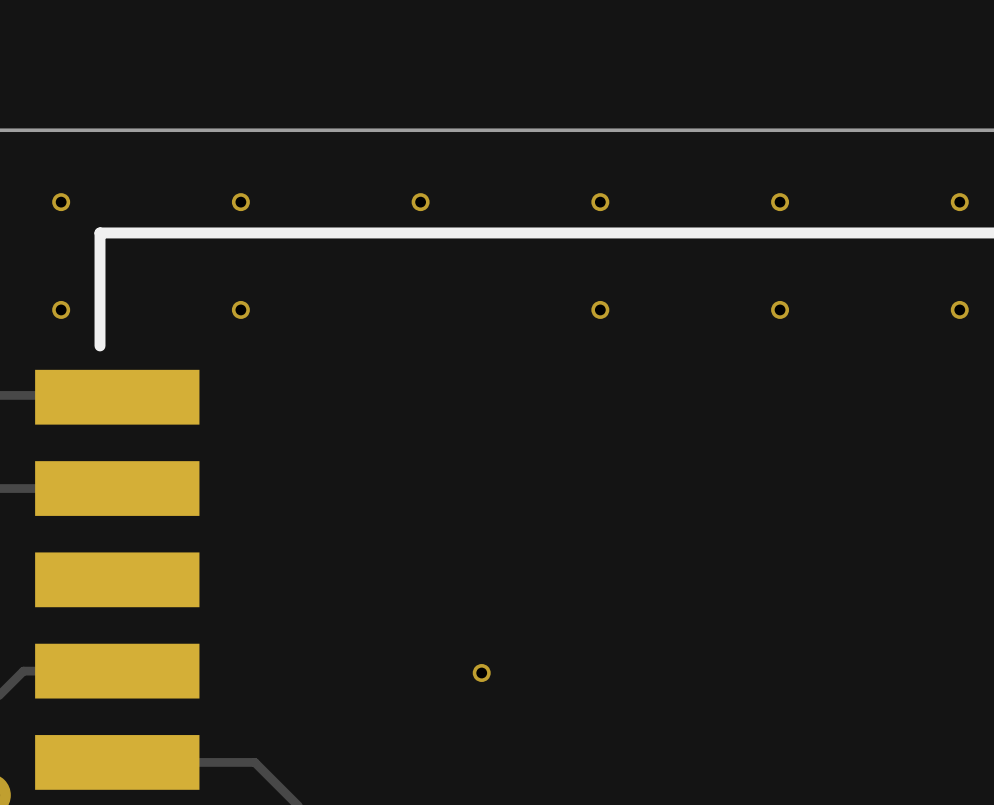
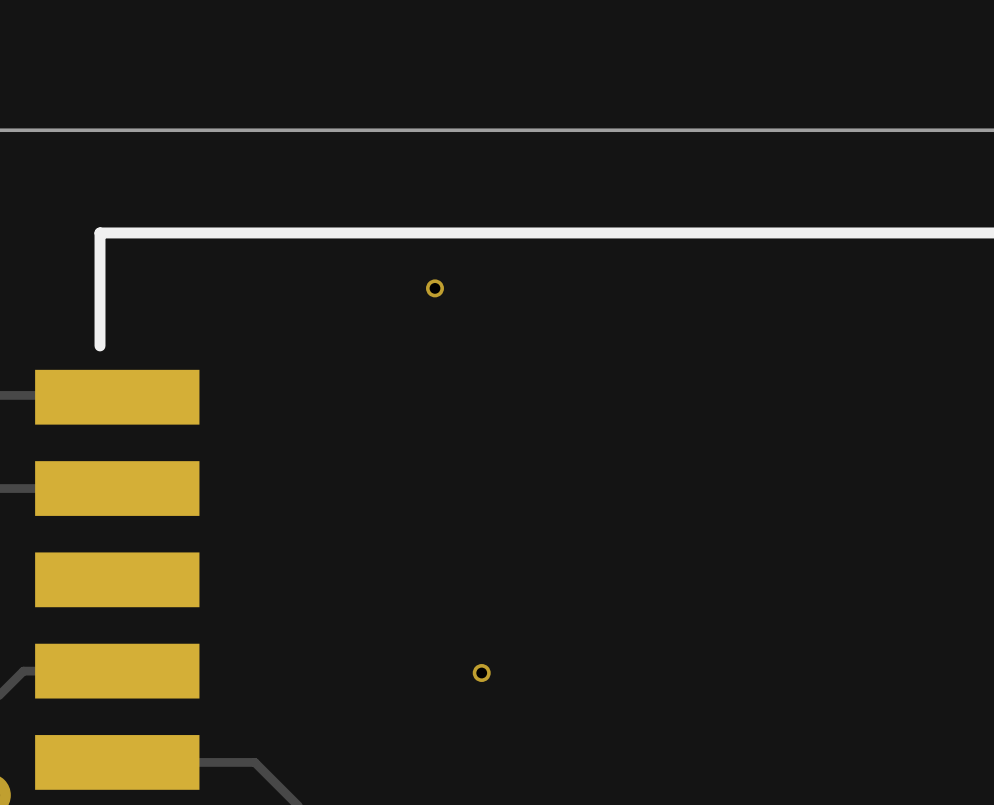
via: (61, 202) -> none
via: (240, 202) -> none
via: (420, 202) -> none
via: (600, 202) -> none
via: (780, 202) -> none
via: (959, 202) -> none
via: none -> (434, 288)
via: (61, 309) -> none
via: (240, 309) -> none
via: (600, 309) -> none
via: (780, 309) -> none
via: (959, 309) -> none

